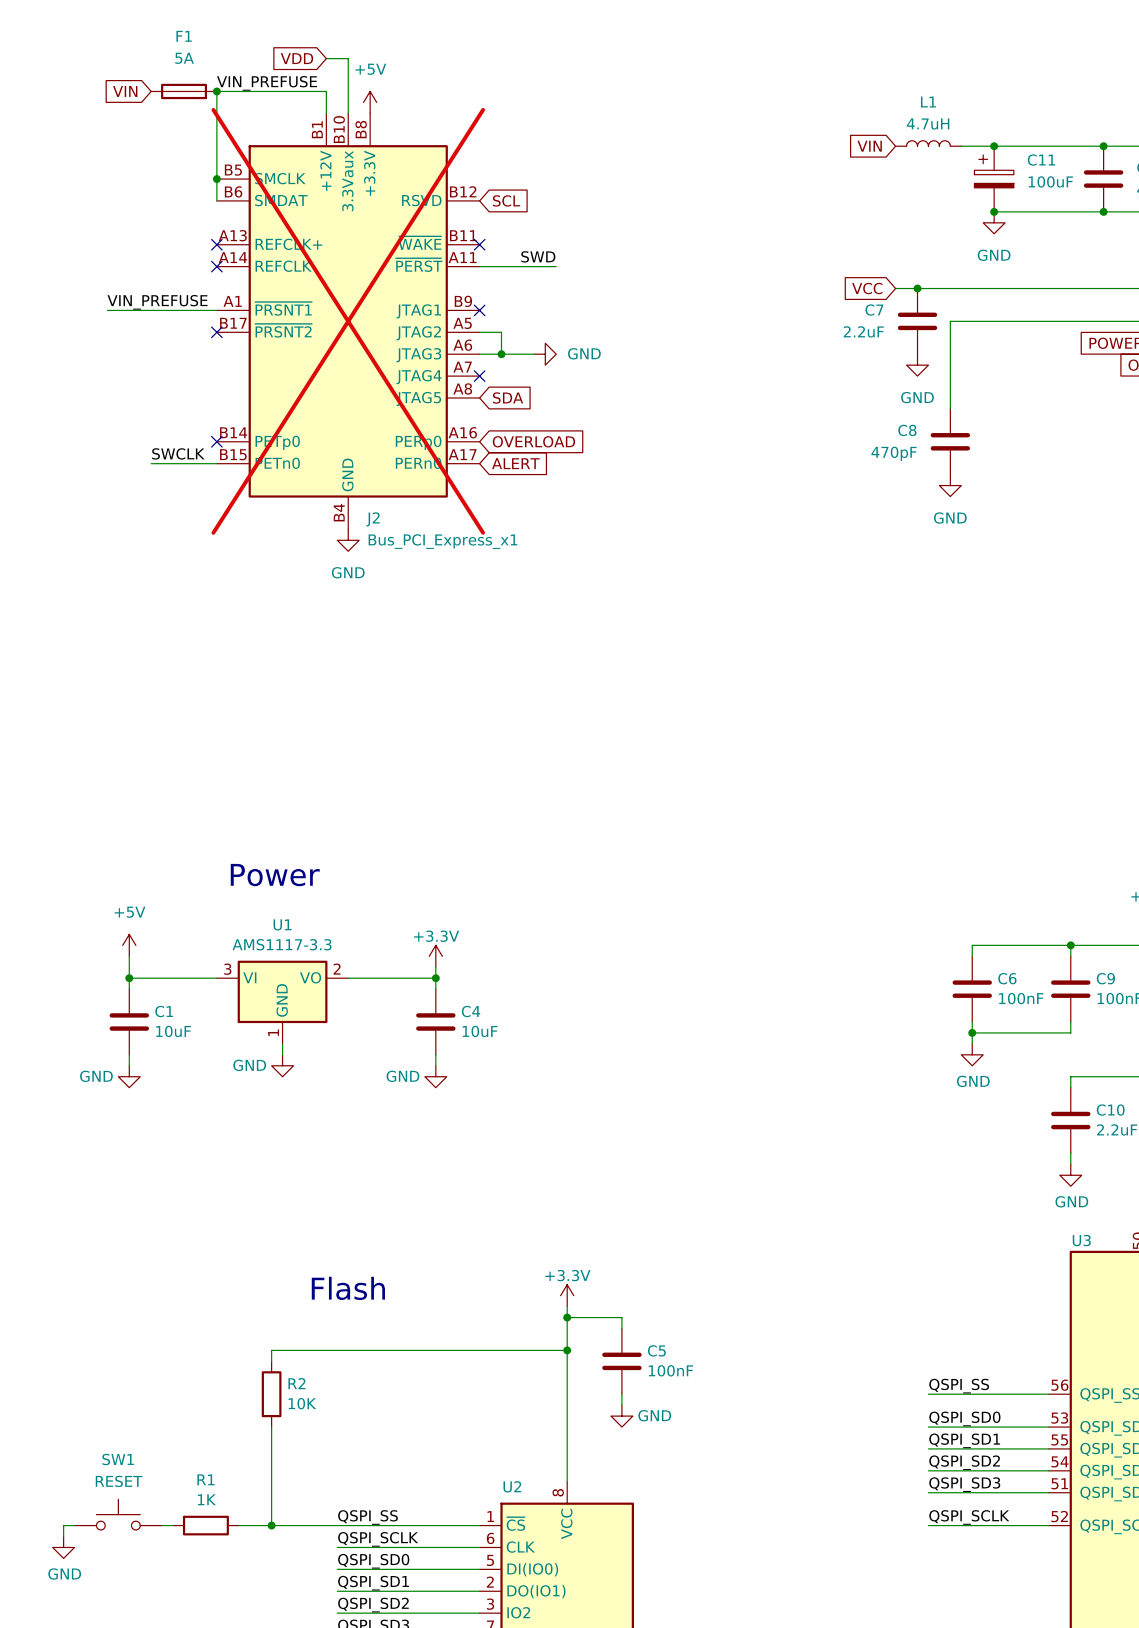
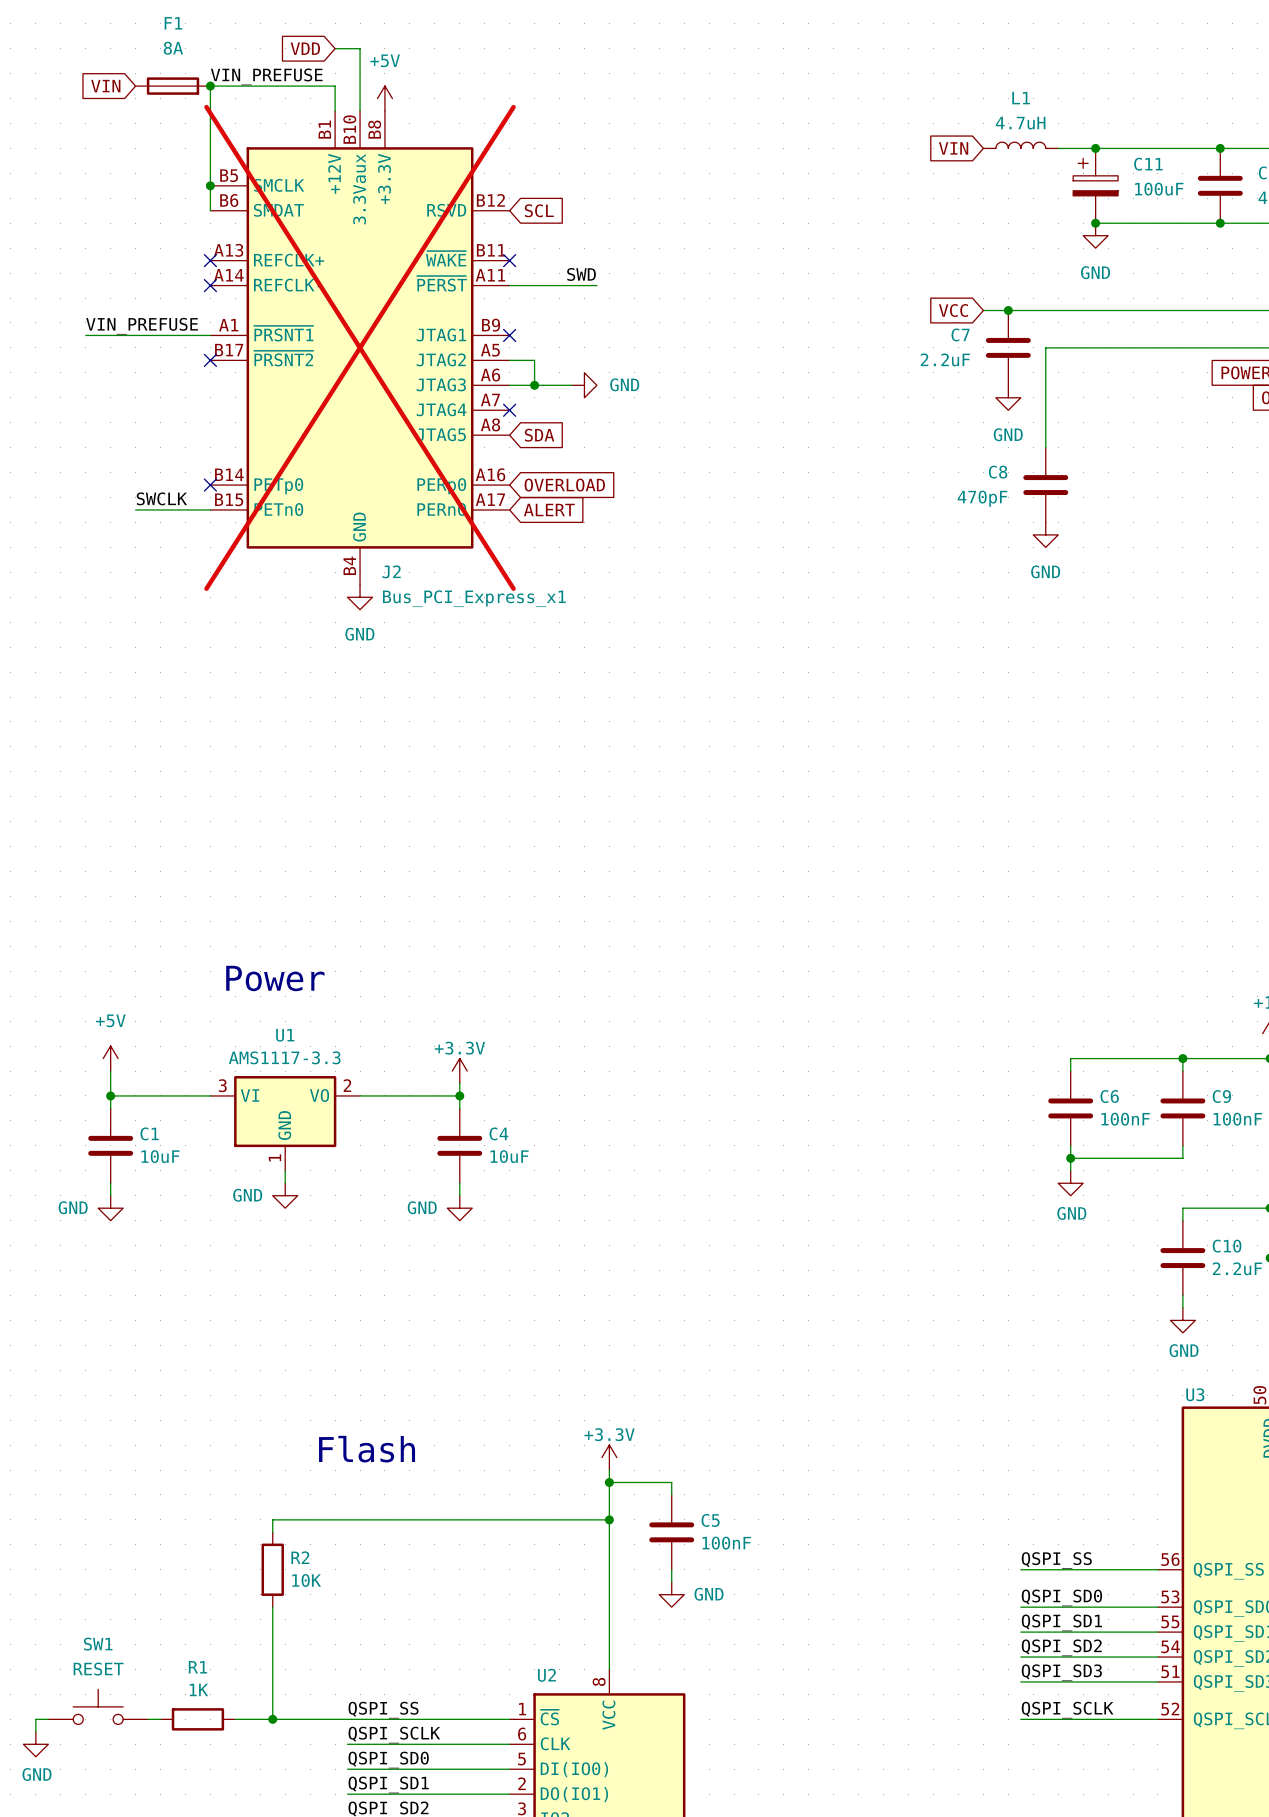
F1 value: 5A (184, 58) -> 8A (173, 48)

